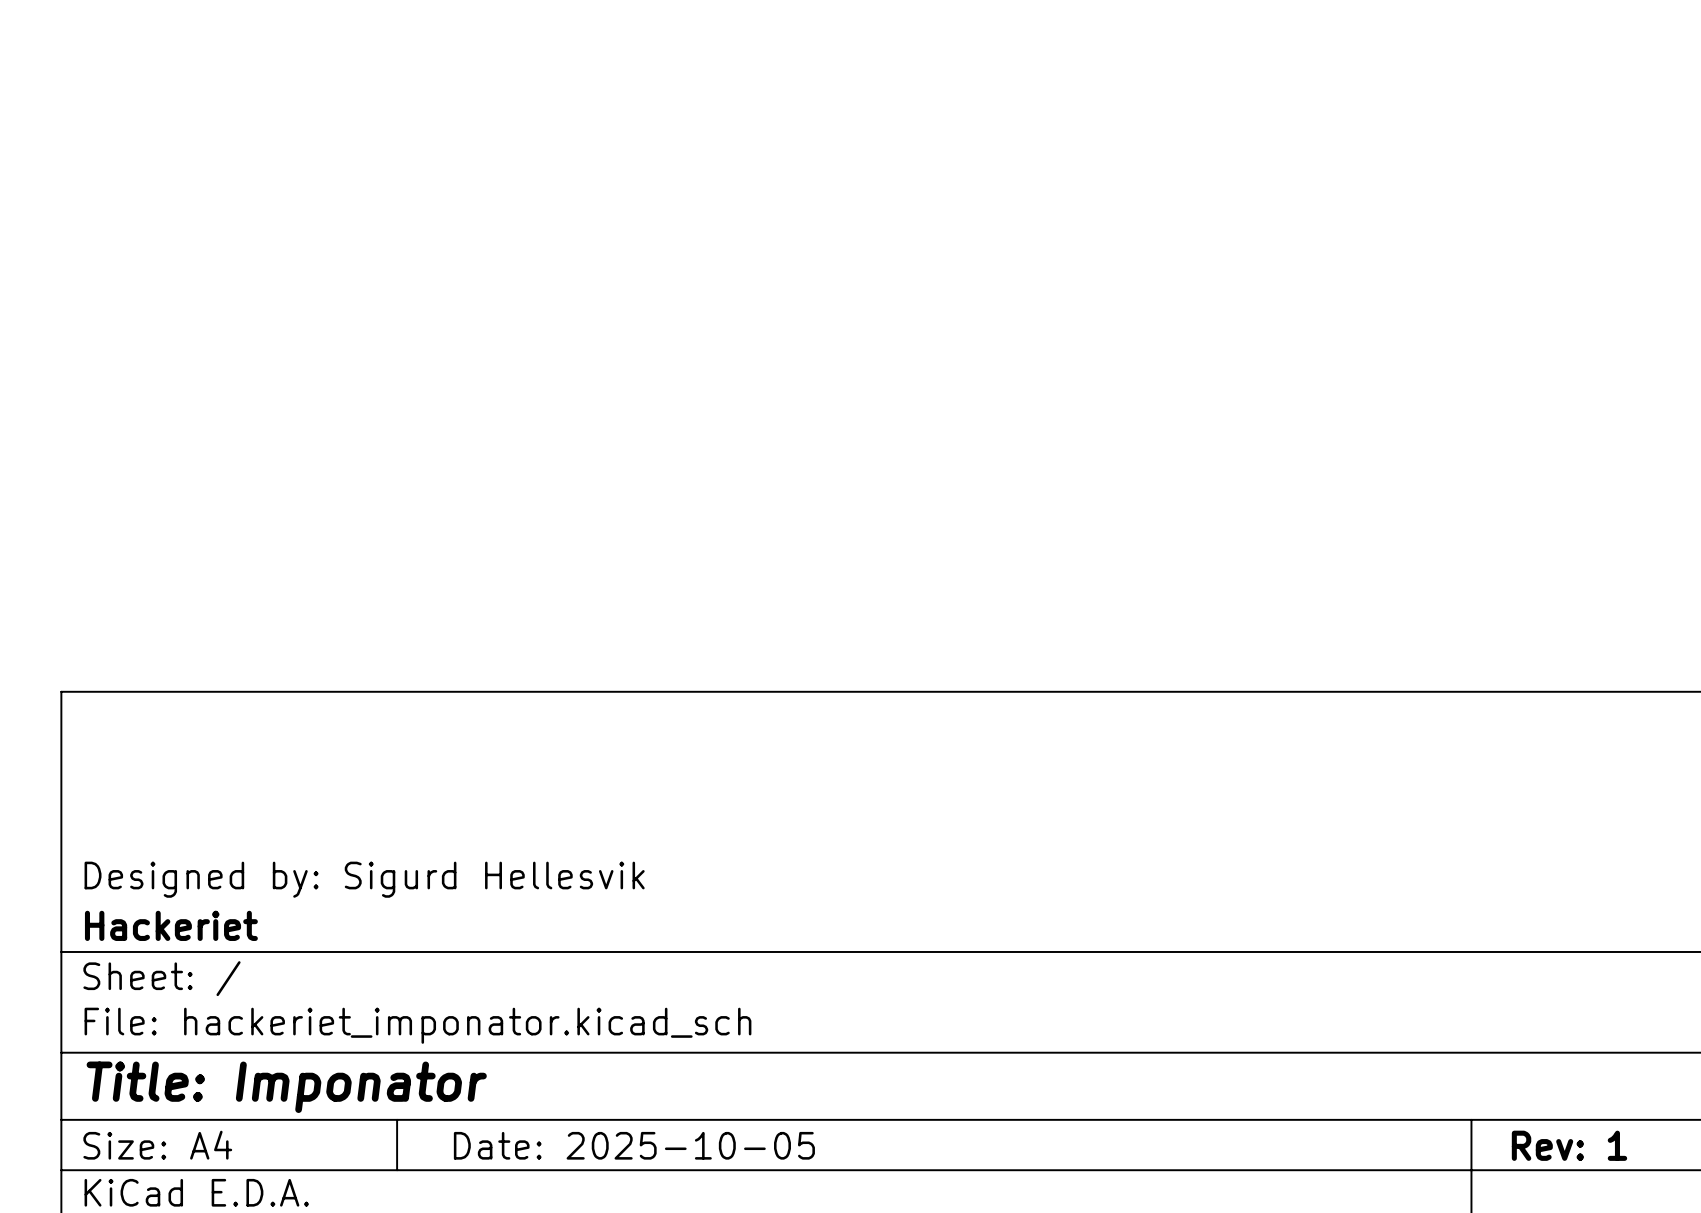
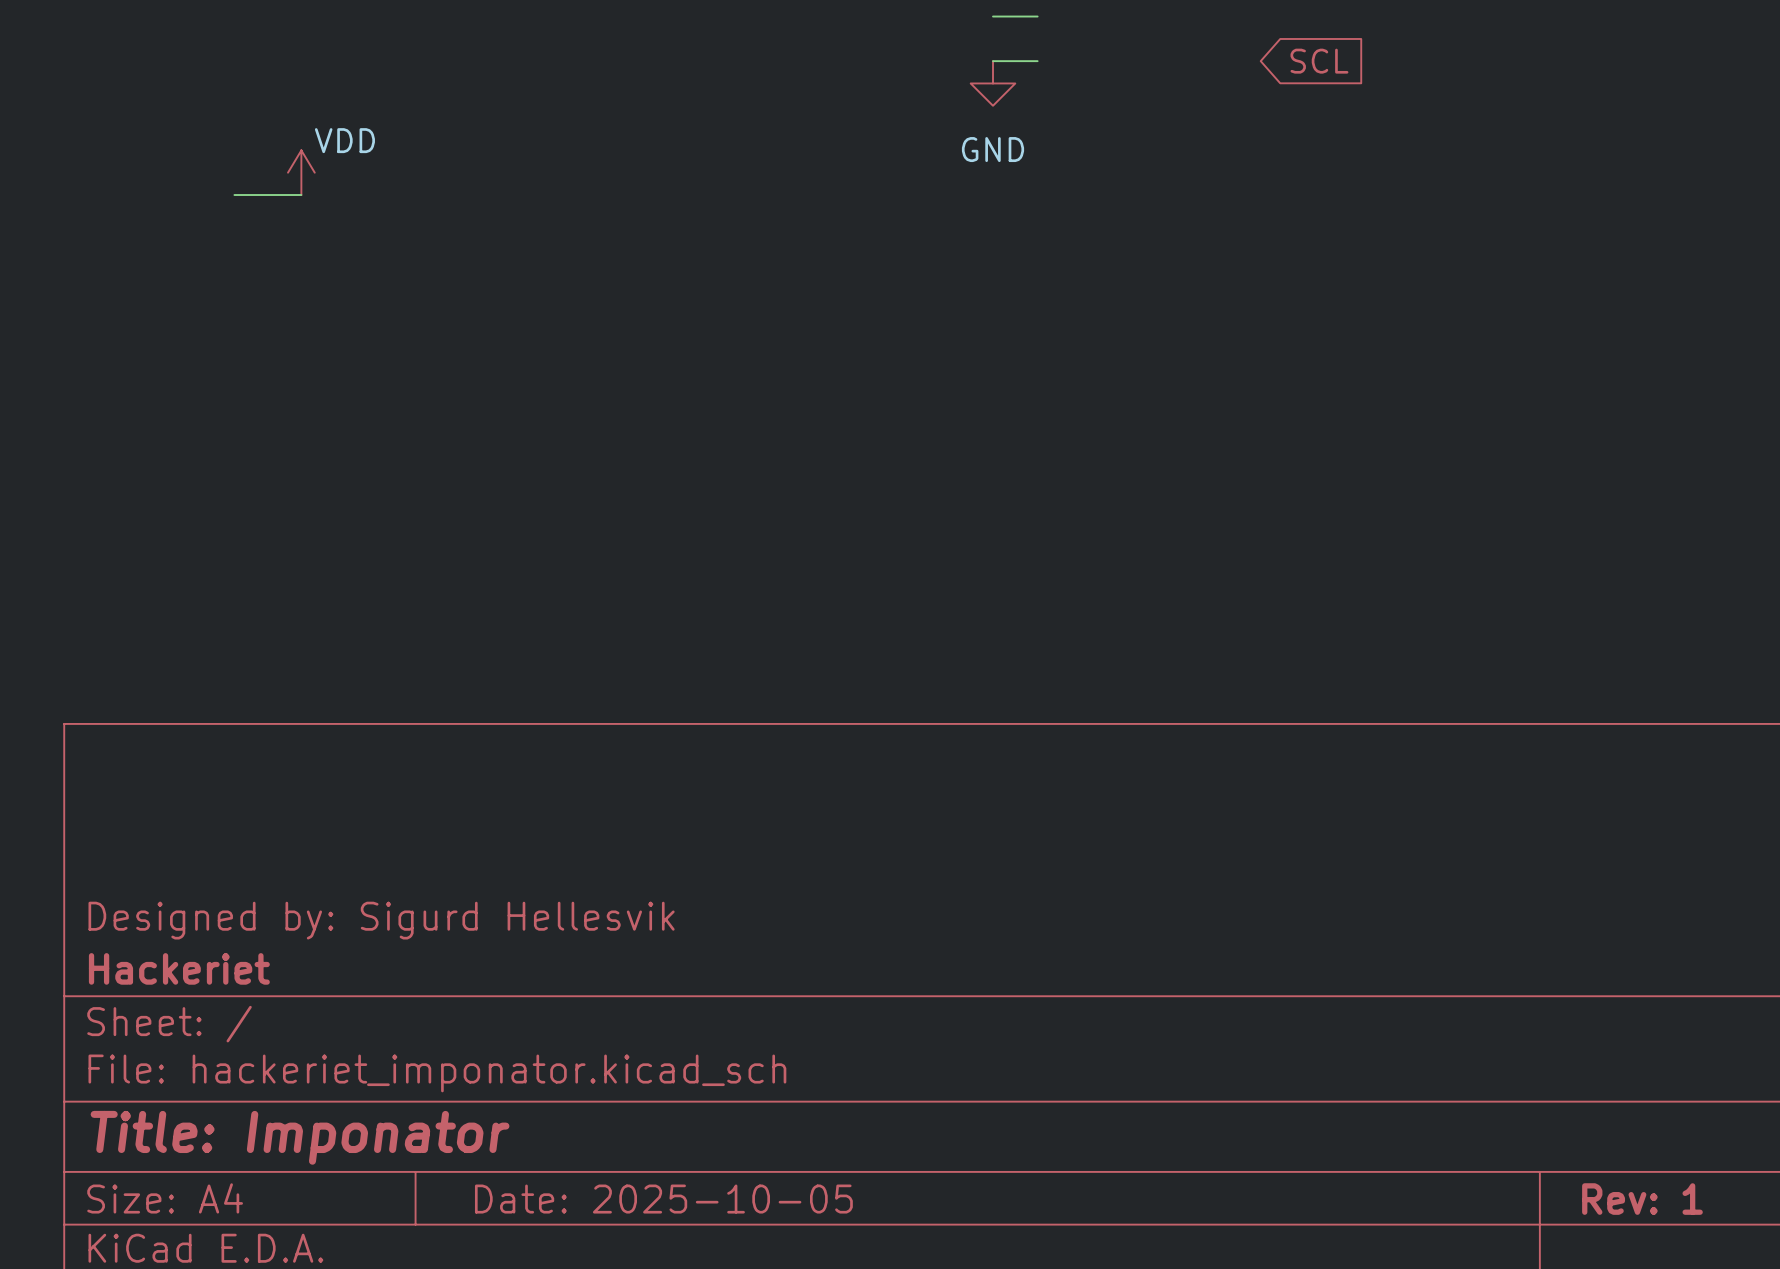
wire: none -> (993, 16) (1037, 16)
wire: none -> (993, 61) (1037, 61)
global label: none -> SCL (1319, 61)
power symbol: none -> GND (993, 83)
power symbol: none -> VDD (301, 172)
wire: none -> (234, 195) (301, 195)

